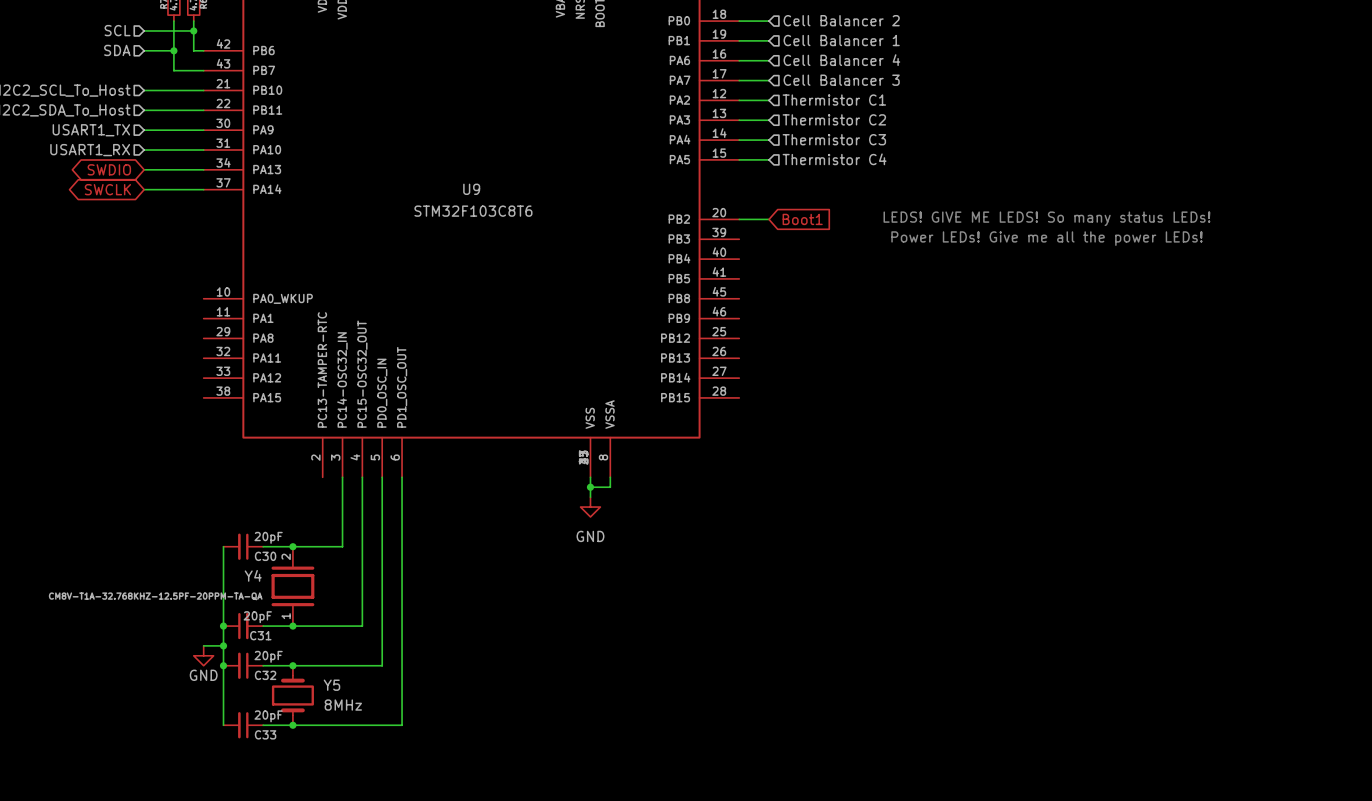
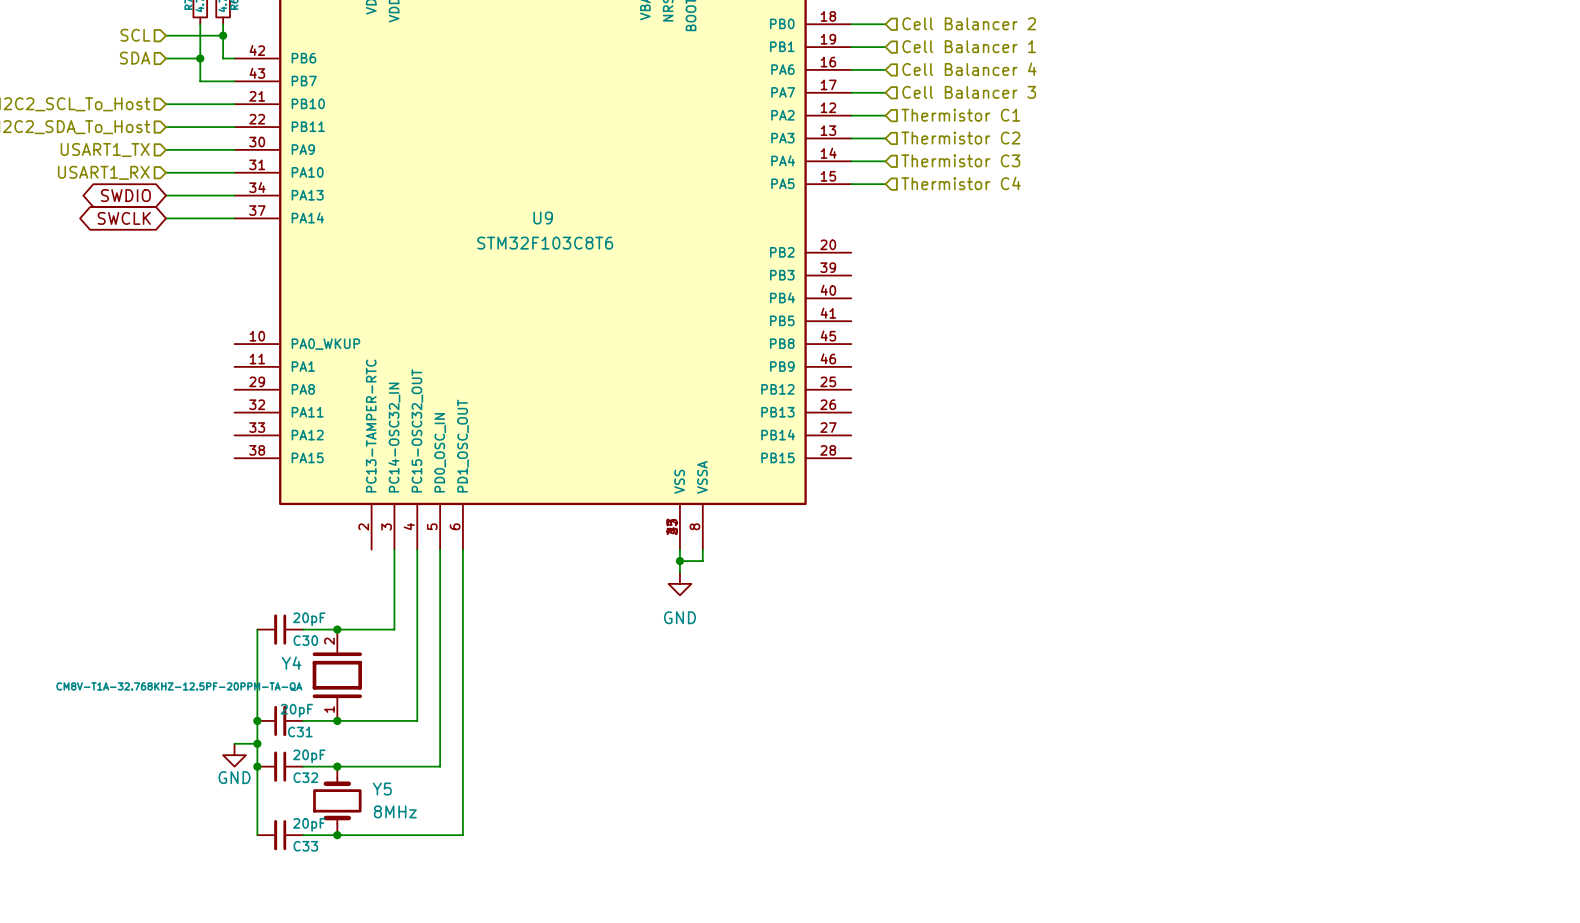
text: LEDS! GIVE ME LEDS! So many status LEDs! (1046, 218) -> none
wire: (739, 219) (769, 219) -> none
global label: Boot1 (802, 219) -> none
text: Power LEDs! Give me all the power LEDs! (1046, 238) -> none

